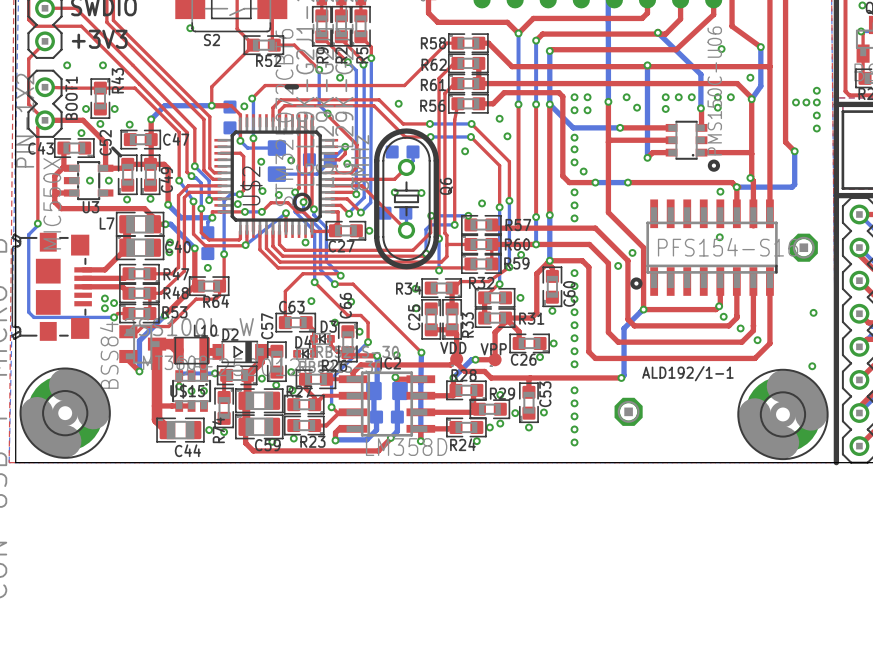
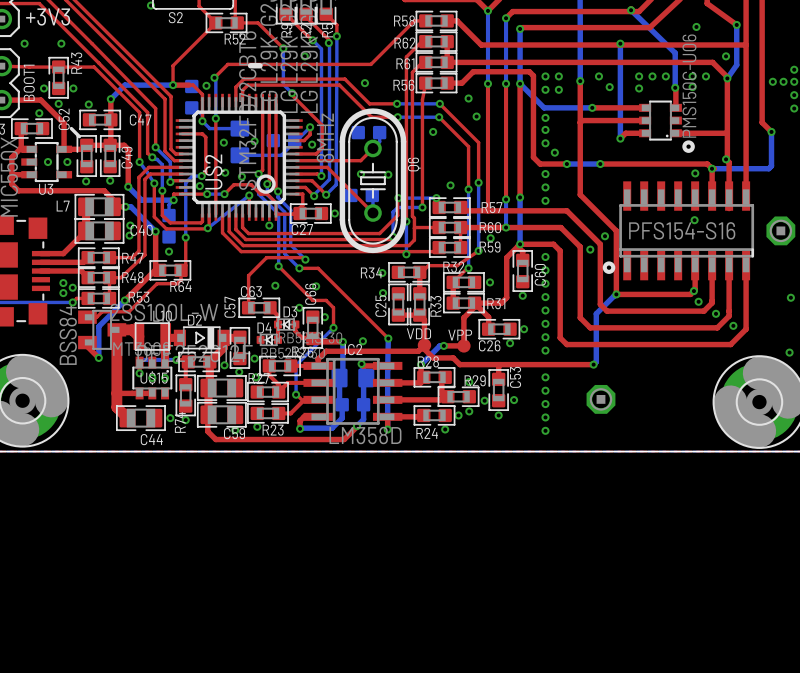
text: ALD192/1-1 (687, 373) -> none

